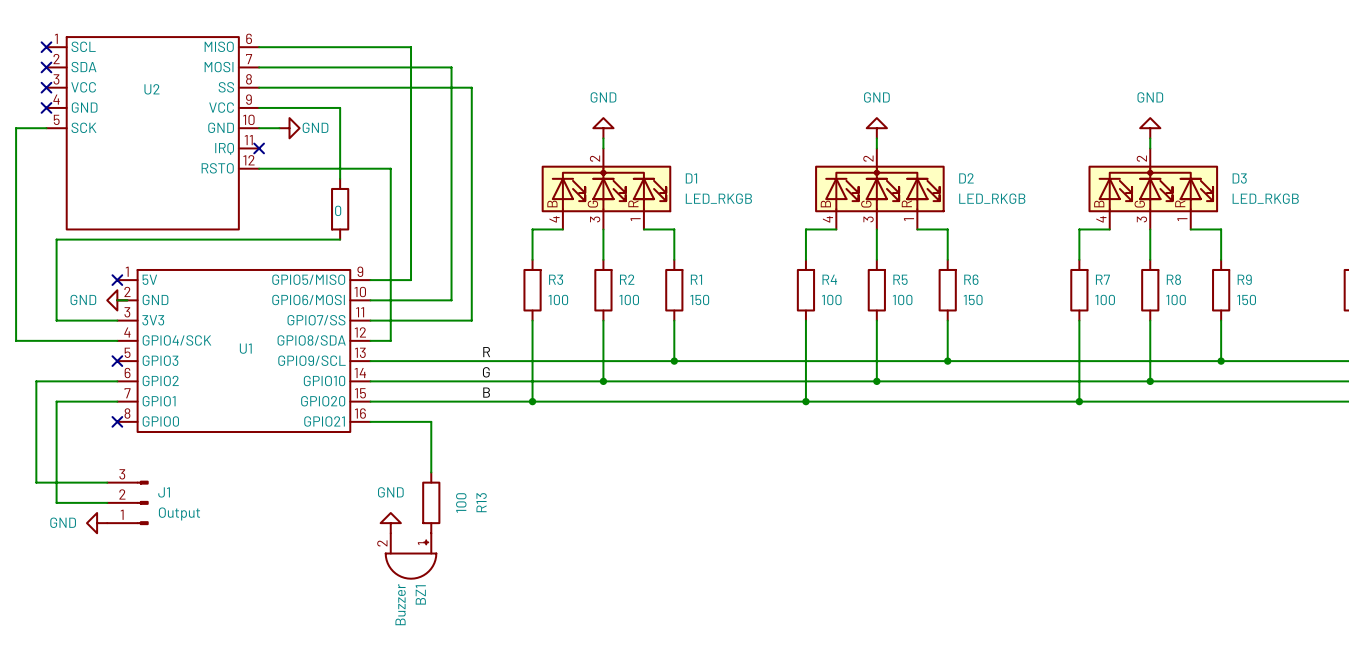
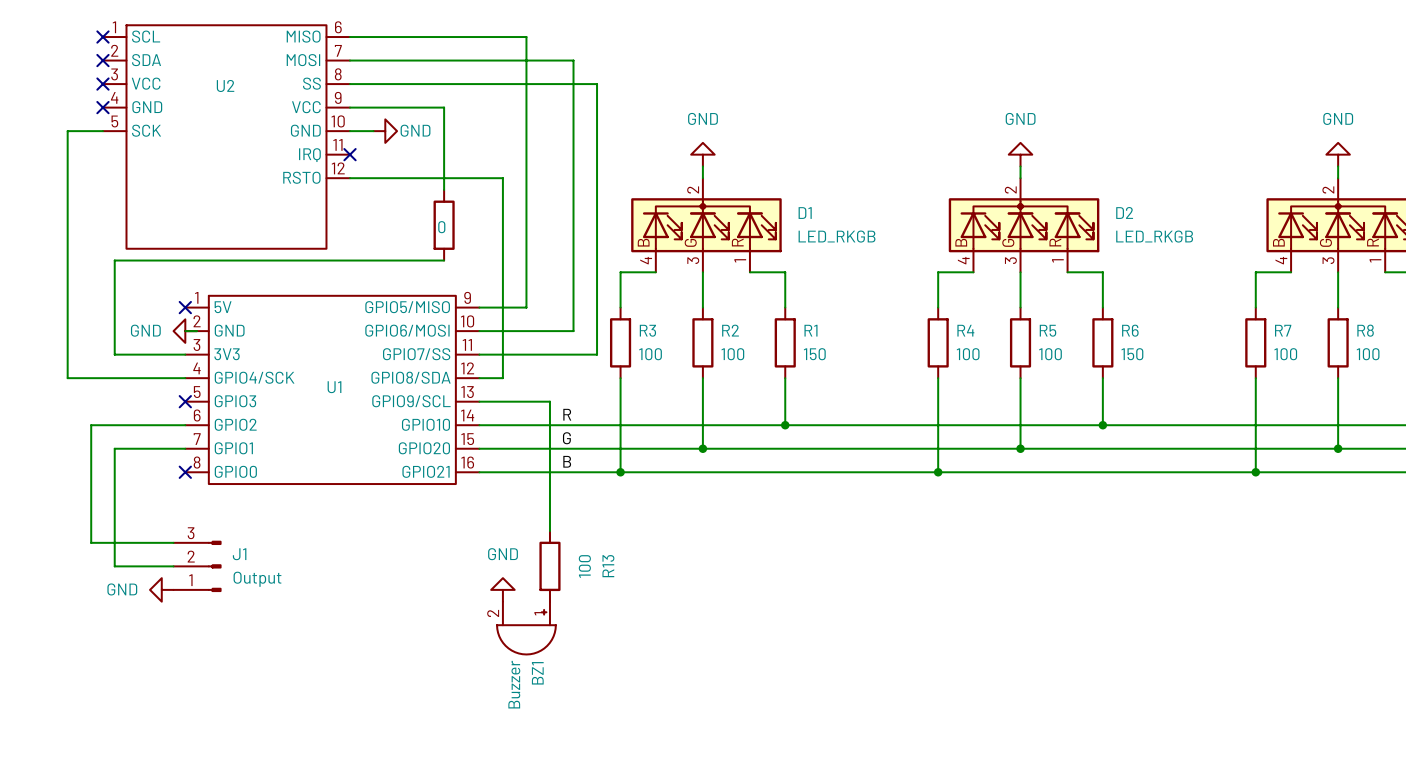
no-connect mark: none -> (102, 37)
wire: none -> (350, 37) (526, 37) (526, 84) (597, 84) (597, 354) (526, 354)
no-connect mark: (46, 47) -> none
no-connect mark: none -> (102, 60)
wire: (411, 47) (411, 280) (370, 280) -> (479, 60) (573, 60) (573, 331) (479, 331)
no-connect mark: (46, 67) -> none
no-connect mark: none -> (102, 84)
no-connect mark: (46, 87) -> none
no-connect mark: none -> (102, 107)
wire: (380, 87) (471, 87) (471, 320) (431, 320) -> (350, 178) (502, 178) (502, 378)
wire: none -> (444, 107) (444, 189)
no-connect mark: (46, 107) -> none
wire: (319, 107) (340, 107) (340, 178) -> none
wire: (46, 128) (16, 128) (16, 340) (117, 340) -> none
wire: (259, 128) (279, 128) -> none
power symbol position: GND (289, 128) -> GND (385, 131)
U2 position: (152, 133) -> (226, 137)
no-connect mark position: (259, 148) -> (350, 154)
wire: (259, 168) (390, 168) (390, 340) (370, 340) -> none
part position: (340, 209) -> (444, 225)
wire: none -> (444, 260) (114, 260) (114, 354) (138, 354)
wire: (56, 239) (340, 239) -> (67, 284) (67, 131) (102, 131)
no-connect mark: none -> (185, 307)
wire: (451, 259) (451, 300) -> (526, 307) (479, 307)
no-connect mark: (117, 280) -> none
wire: none -> (185, 331) (197, 331)
power symbol position: GND (117, 300) -> GND (185, 331)
no-connect mark: none -> (185, 401)
wire: none -> (479, 401) (549, 401) (549, 531)
U1 position: (243, 350) -> (332, 389)
no-connect mark: (117, 361) -> none
wire: none -> (185, 425) (91, 425) (91, 542) (173, 542)
wire: (97, 381) (36, 381) (36, 482) (97, 482) -> (114, 448) (114, 566)
wire: (117, 401) (56, 401) (56, 502) (107, 502) -> none
no-connect mark: none -> (185, 472)
no-connect mark: (117, 421) -> none
wire: (370, 421) (431, 421) (431, 472) -> none
J1 position: (127, 502) -> (197, 566)
R13 position: (431, 502) -> (549, 566)
power symbol position: GND (97, 523) -> GND (161, 589)
power symbol position: GND (390, 523) -> GND (502, 589)
BZ1 position: (411, 555) -> (526, 628)

